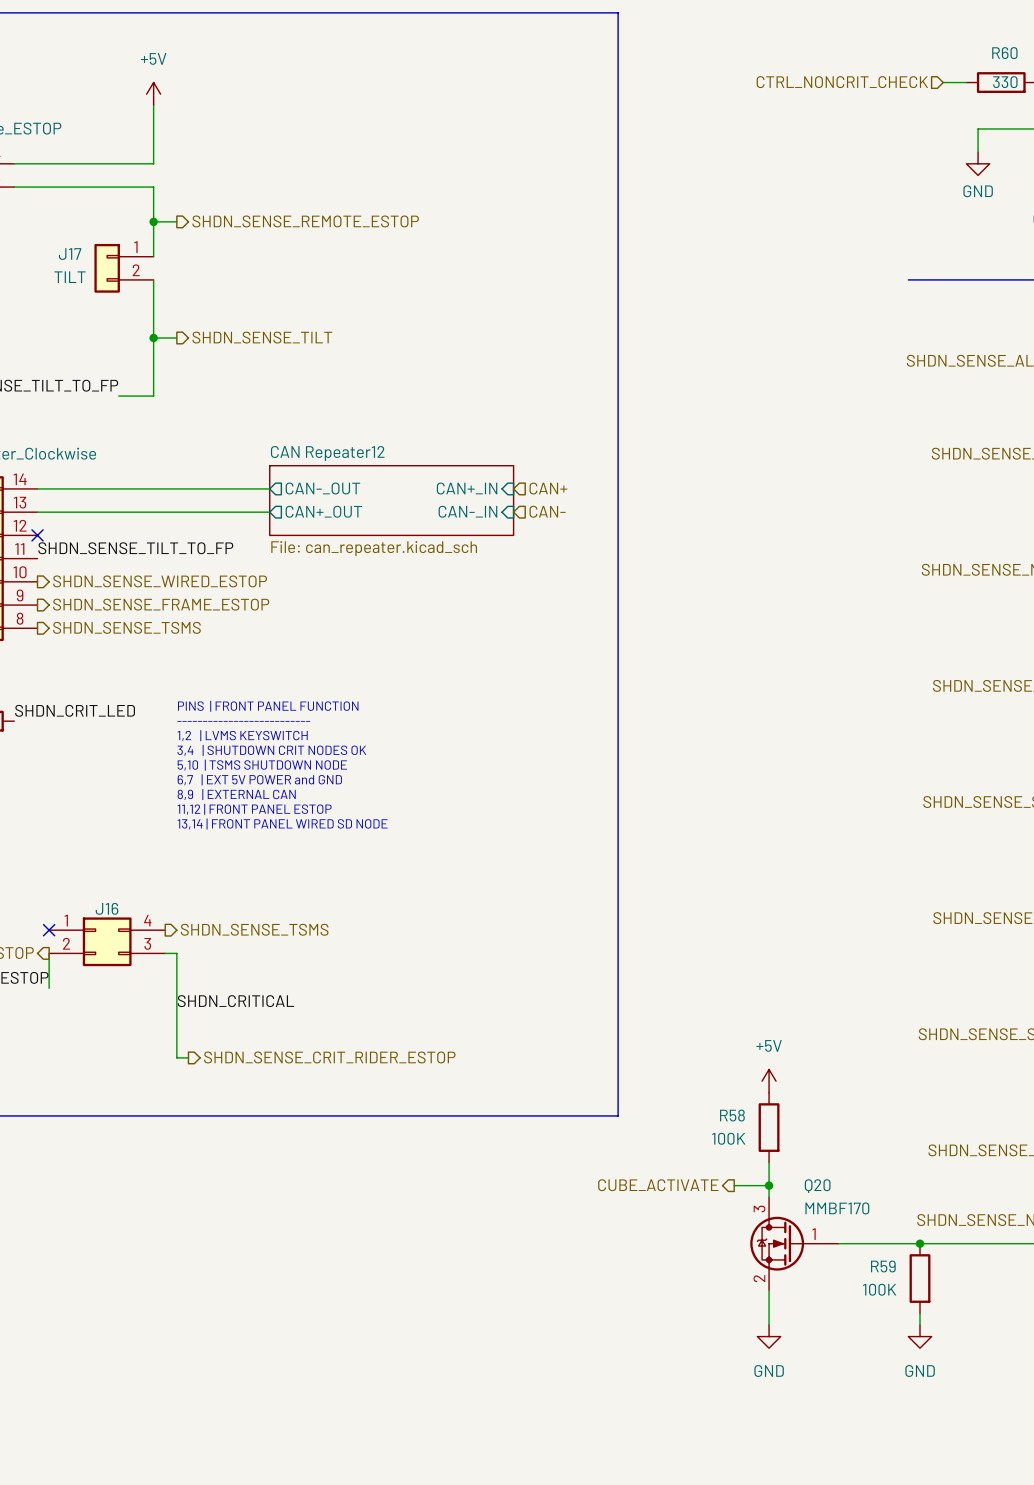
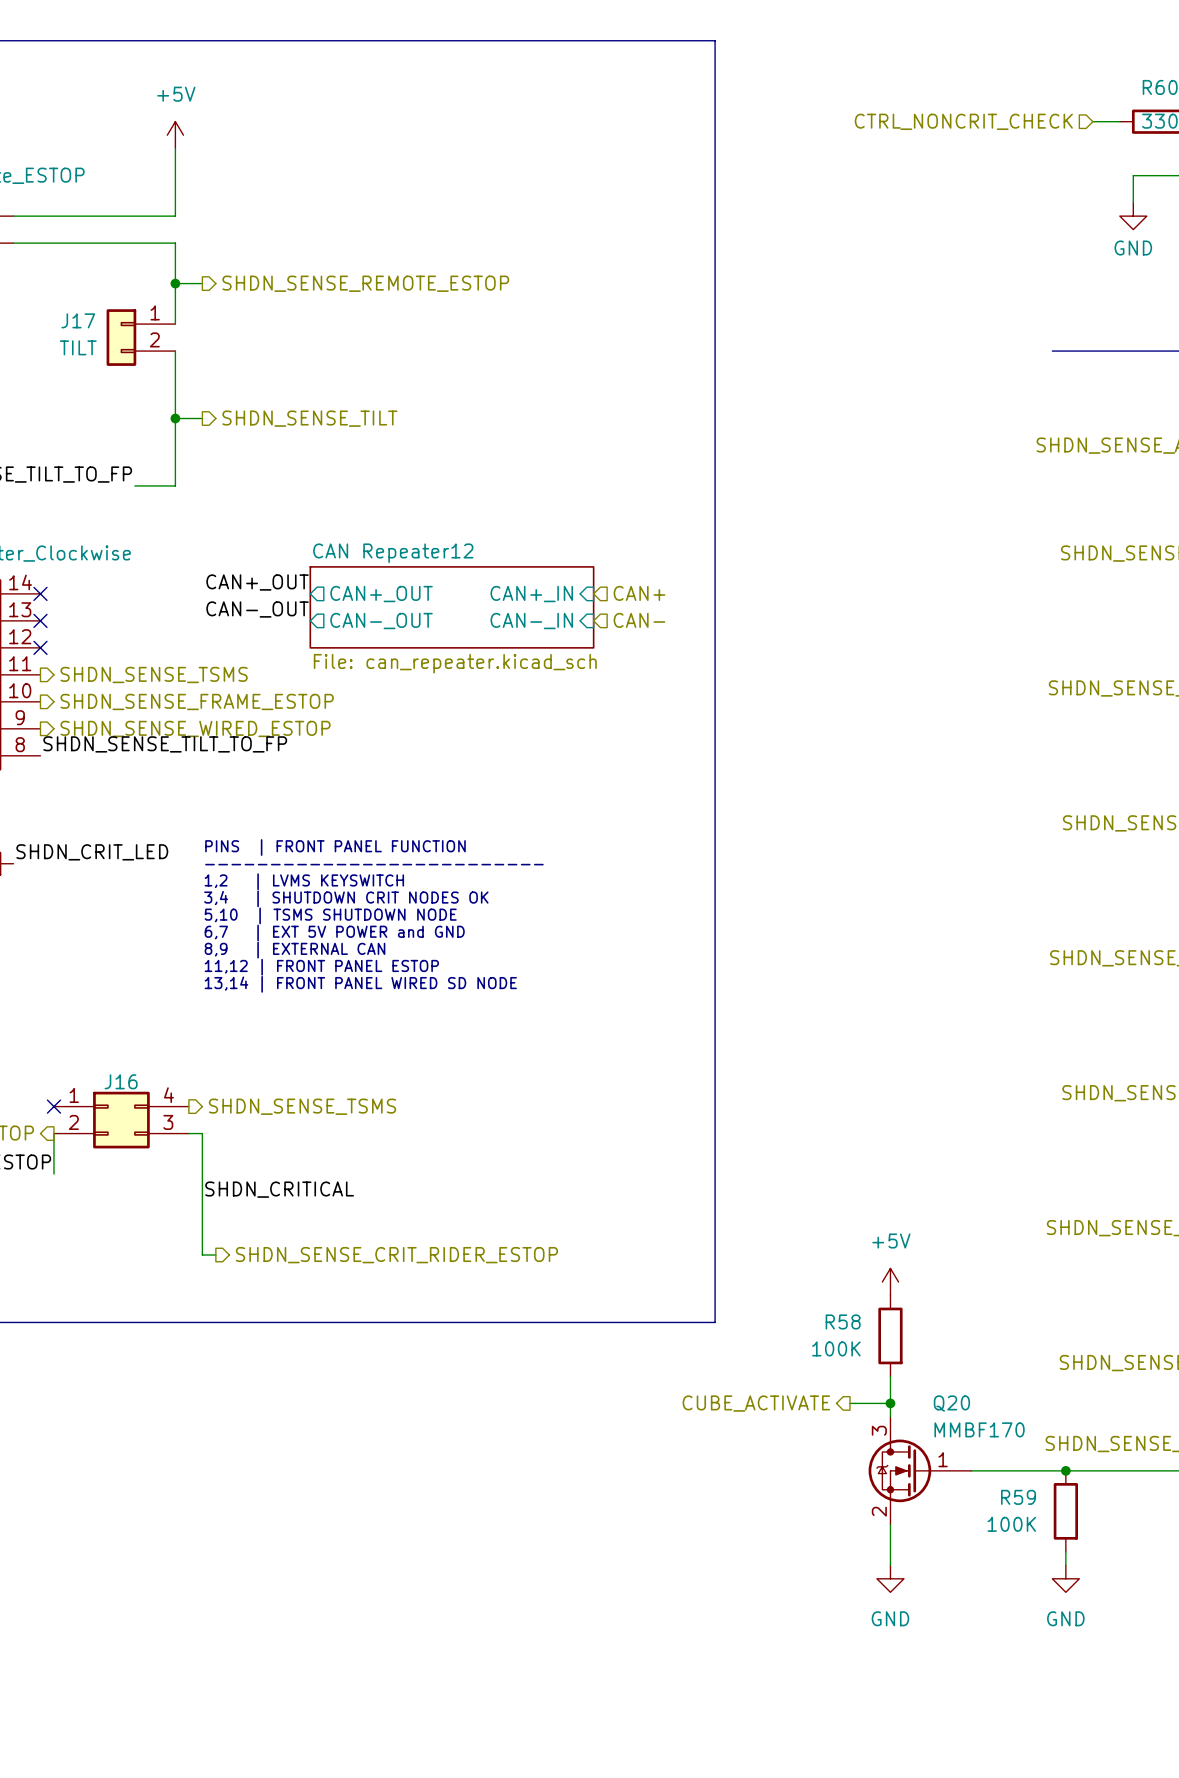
label: none -> CAN+_OUT (257, 582)
wire: (37, 488) (269, 488) -> none
no-connect mark: none -> (40, 593)
sheet pin: CAN-_OUT (322, 488) -> CAN+_OUT (381, 594)
label: none -> CAN-_OUT (257, 609)
sheet pin: CAN+_OUT (323, 511) -> CAN-_OUT (381, 621)
wire: (37, 512) (269, 512) -> none
no-connect mark: none -> (40, 620)
label position: SHDN_SENSE_TILT_TO_FP (135, 548) -> SHDN_SENSE_TILT_TO_FP (165, 744)
hierarchical label: SHDN_SENSE_WIRED_ESTOP (160, 581) -> SHDN_SENSE_FRAME_ESTOP (197, 701)
hierarchical label: SHDN_SENSE_FRAME_ESTOP (161, 604) -> SHDN_SENSE_WIRED_ESTOP (195, 728)
hierarchical label position: SHDN_SENSE_TSMS (126, 627) -> SHDN_SENSE_TSMS (154, 674)

